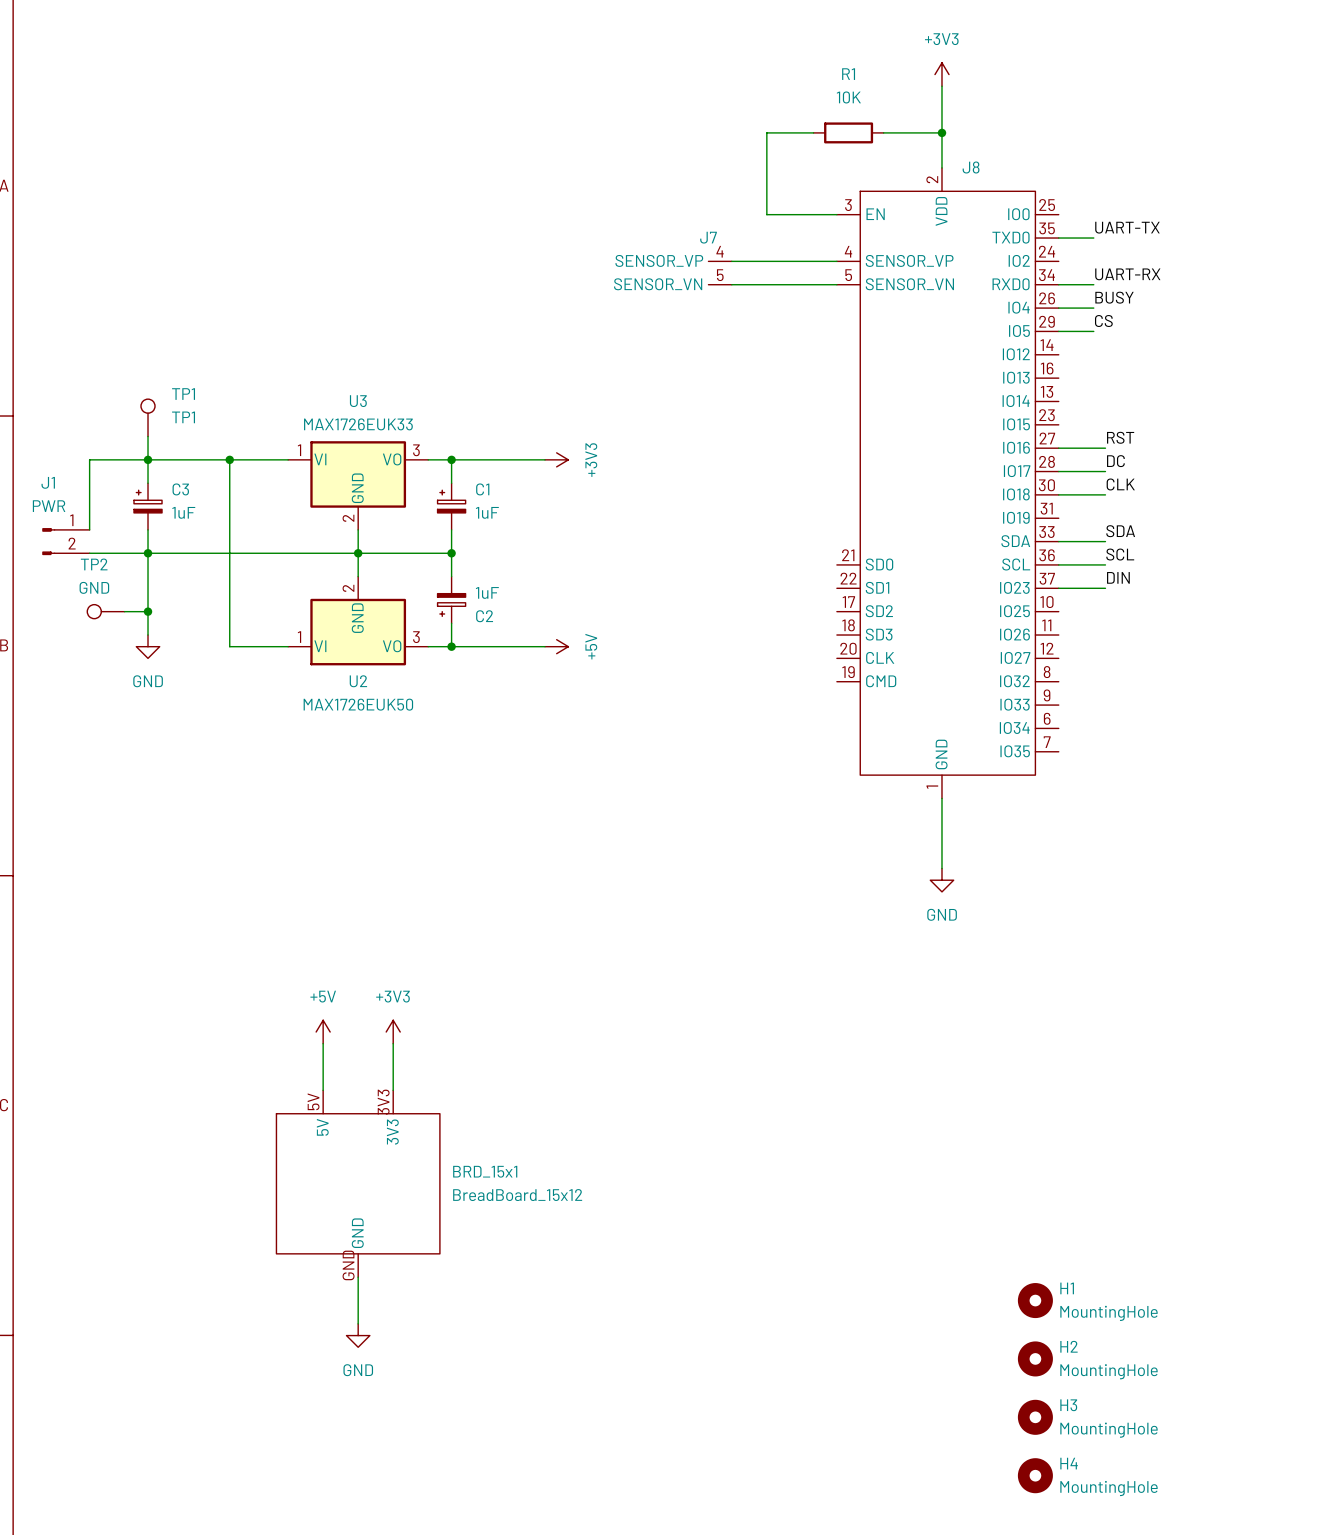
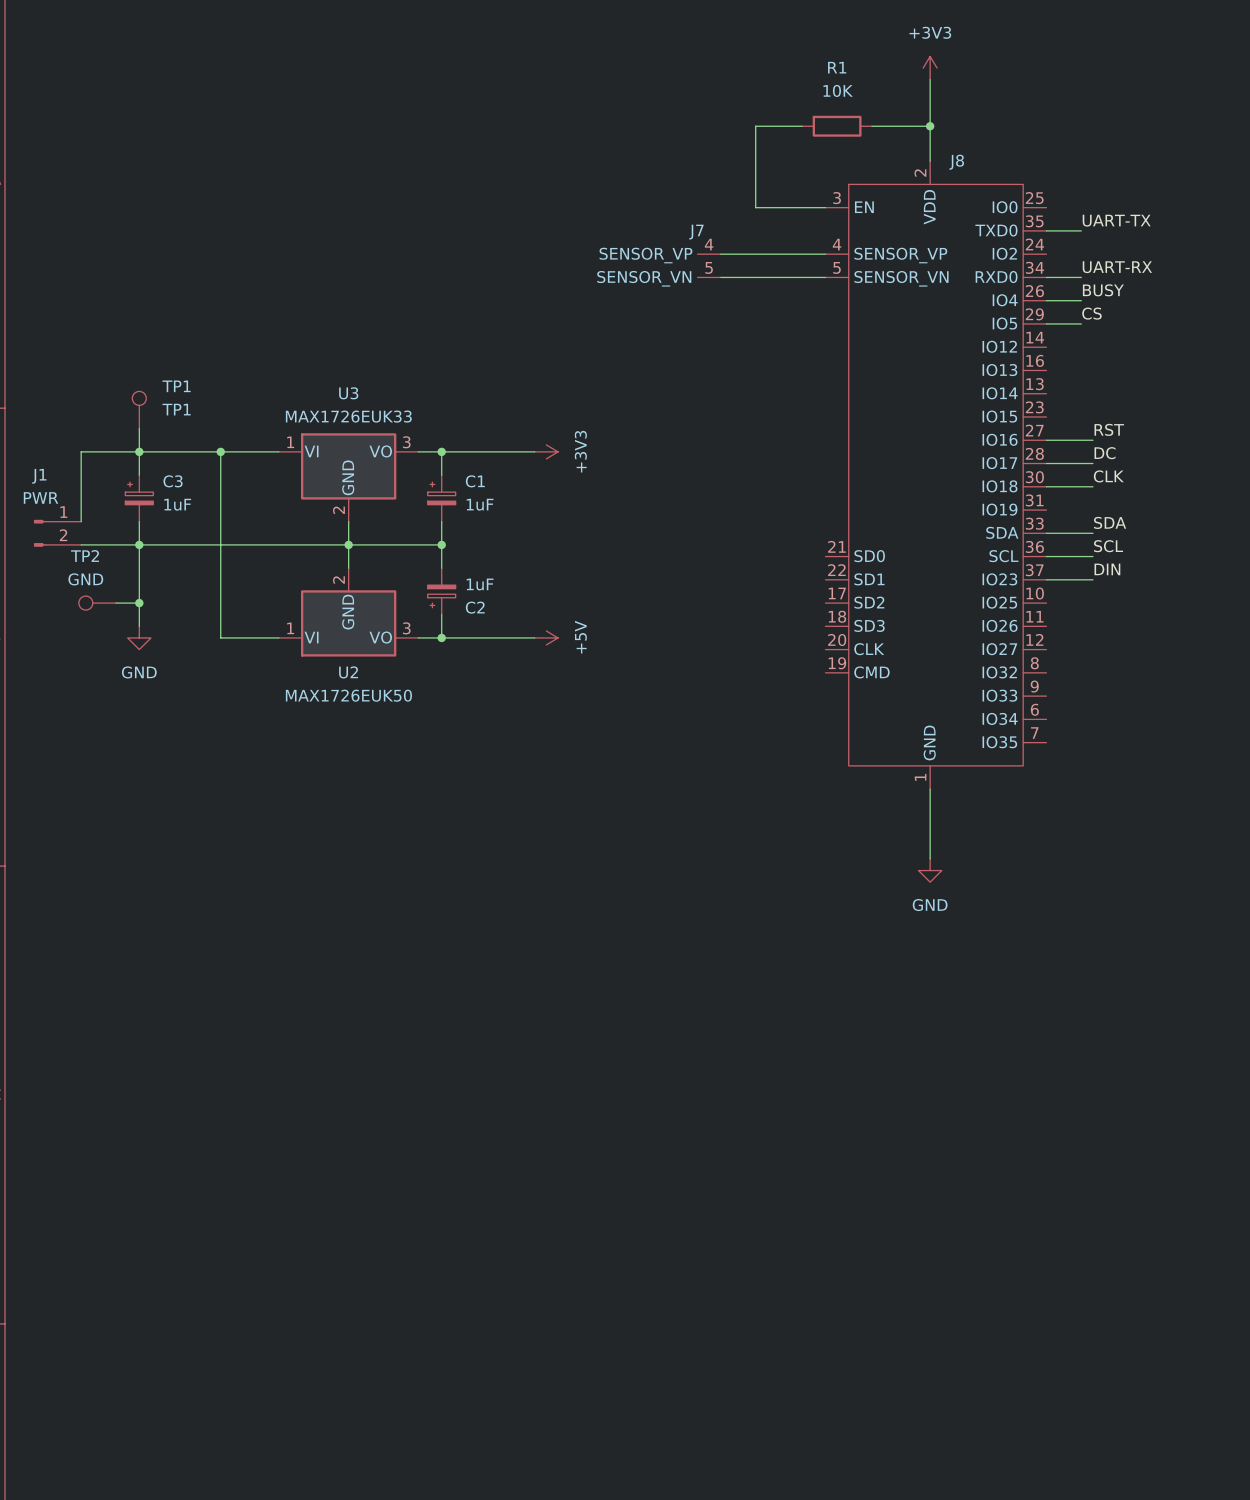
power symbol: +5V (323, 1032) -> none
power symbol: +3V3 (393, 1032) -> none
wire: (323, 1043) (323, 1090) -> none
wire: (393, 1043) (393, 1090) -> none
BRD_15x1: BreadBoard_15x12 (358, 1183) -> none
wire: (358, 1277) (358, 1323) -> none
H1: MountingHole (1035, 1300) -> none
power symbol: GND (358, 1335) -> none
H2: MountingHole (1035, 1358) -> none
H3: MountingHole (1035, 1417) -> none
H4: MountingHole (1035, 1475) -> none

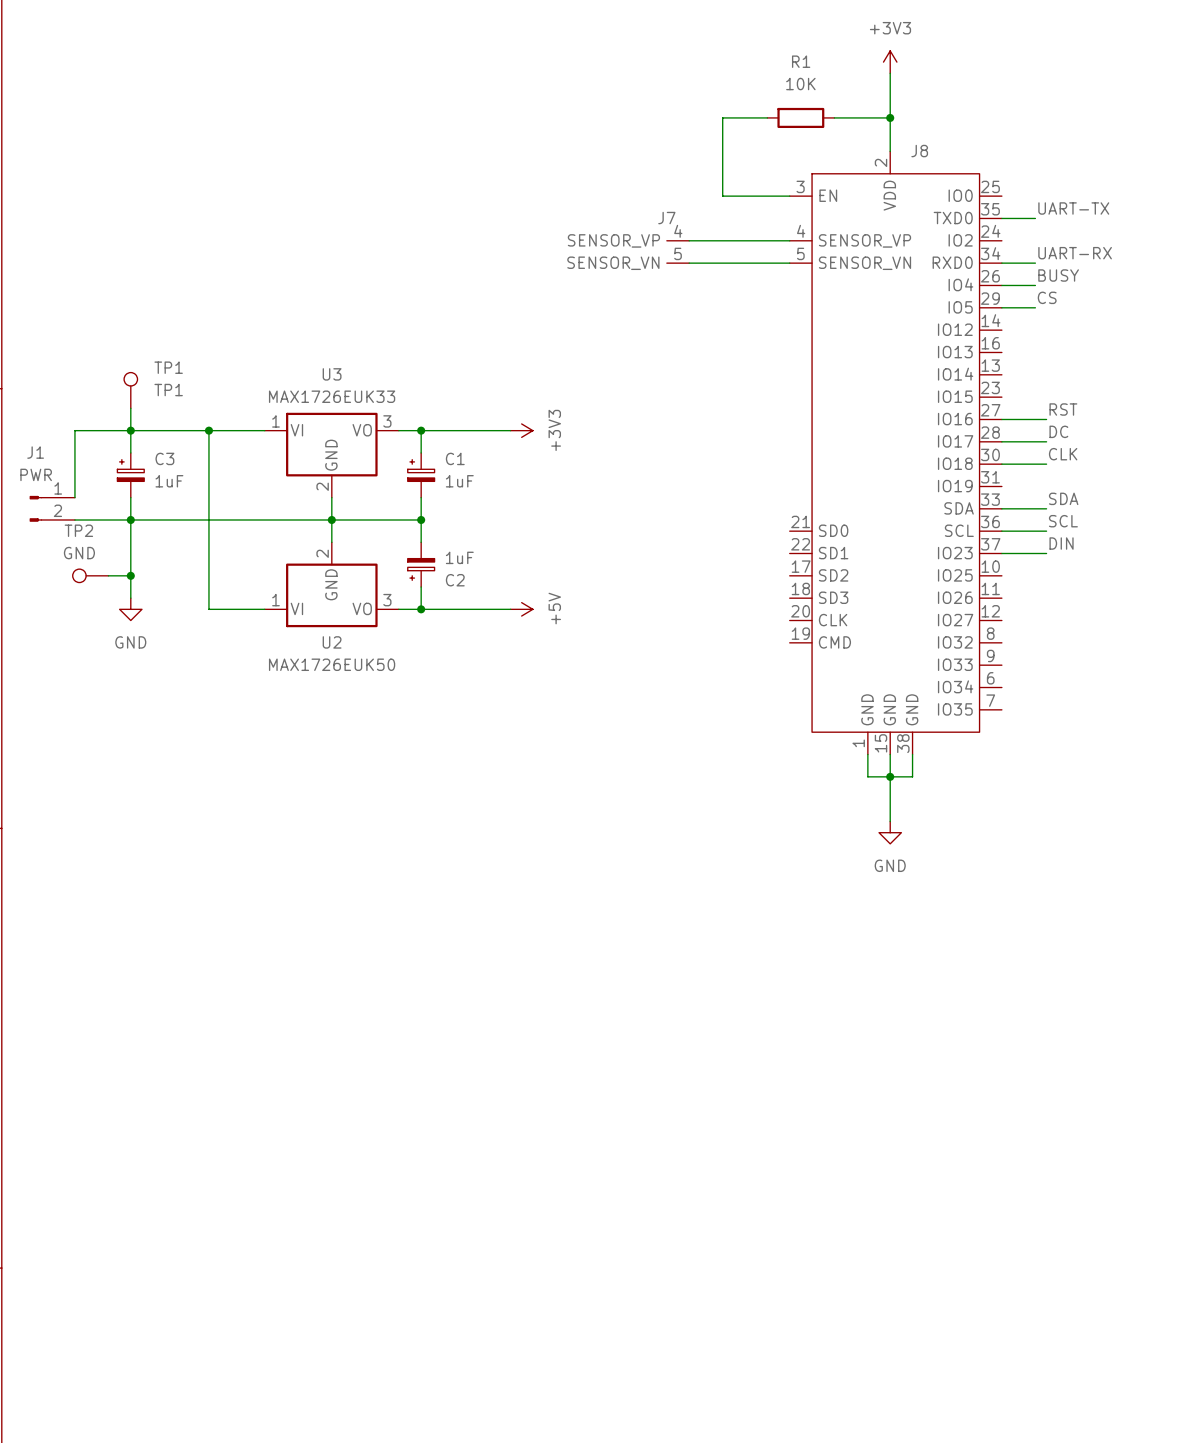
J8 symbol: [825, 161, 1047, 790] -> [789, 151, 1002, 755]
wire: none -> (867, 754) (867, 776) (912, 776) (912, 754)
junction: none -> (890, 776)

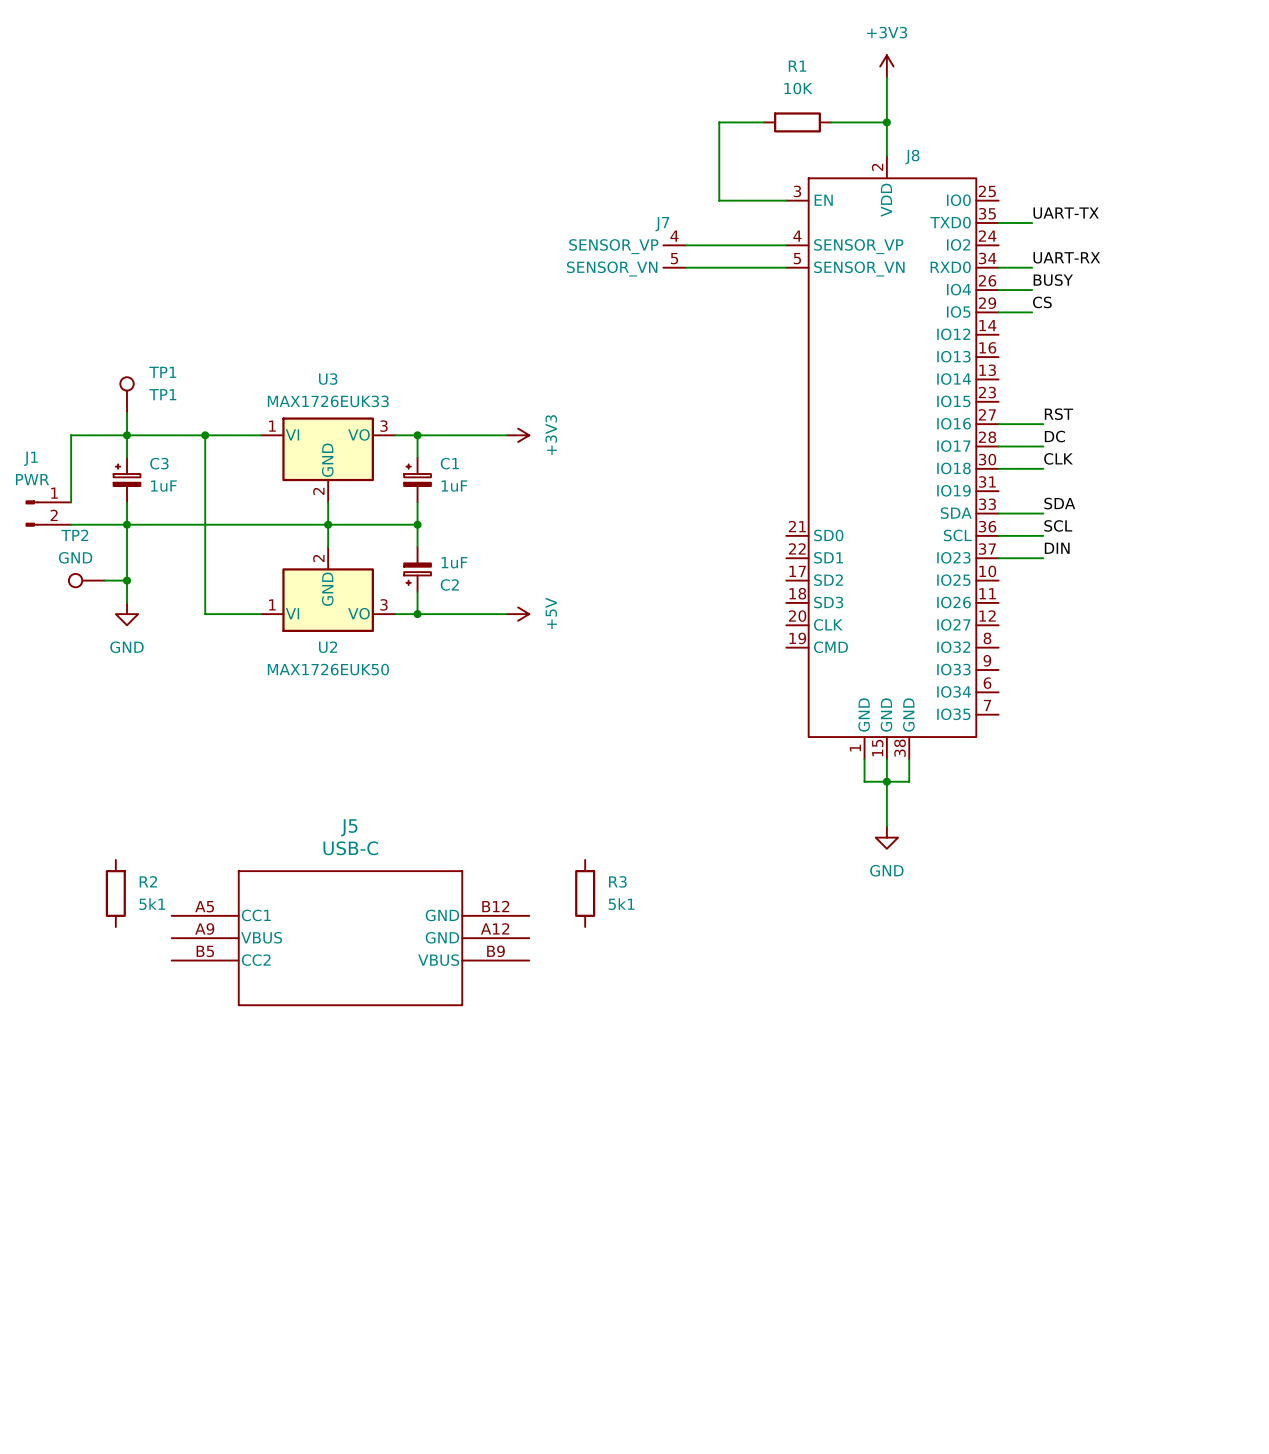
R2: none -> 5k1 (115, 893)
R3: none -> 5k1 (585, 893)
J5: none -> USB-C (350, 938)

